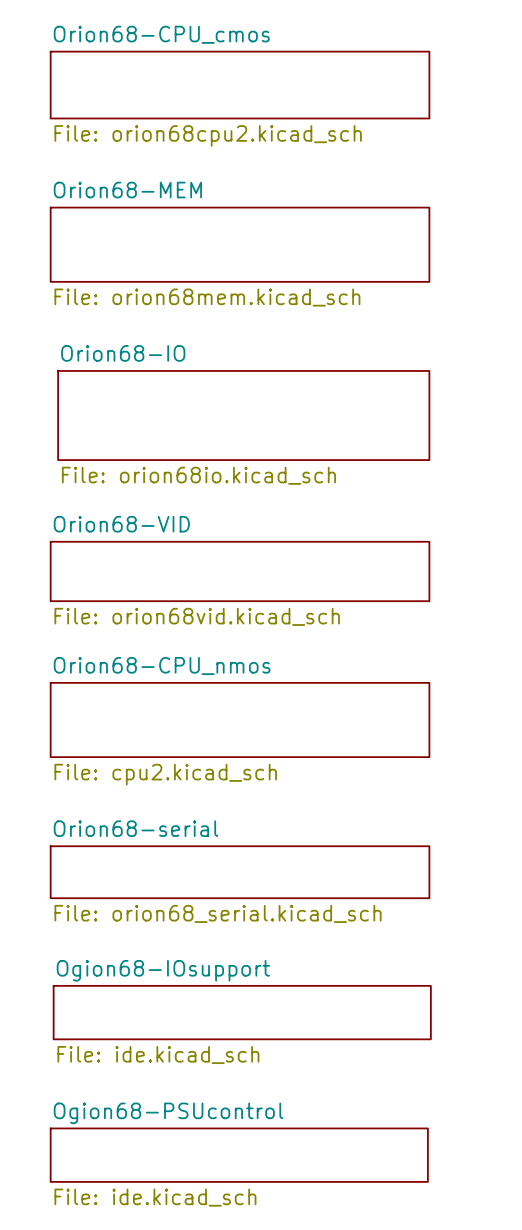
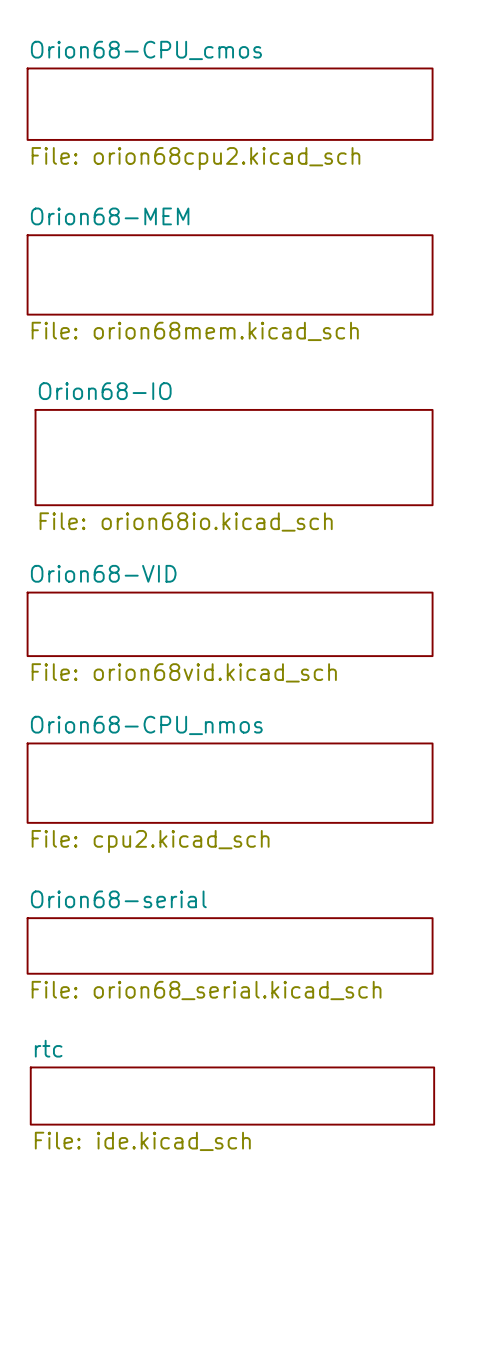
sheet Ogion68-IOsupport name: Ogion68-IOsupport (163, 970) -> rtc (48, 1048)
sheet Ogion68-PSUcontrol: File: ide.kicad_sch (239, 1155) -> none

